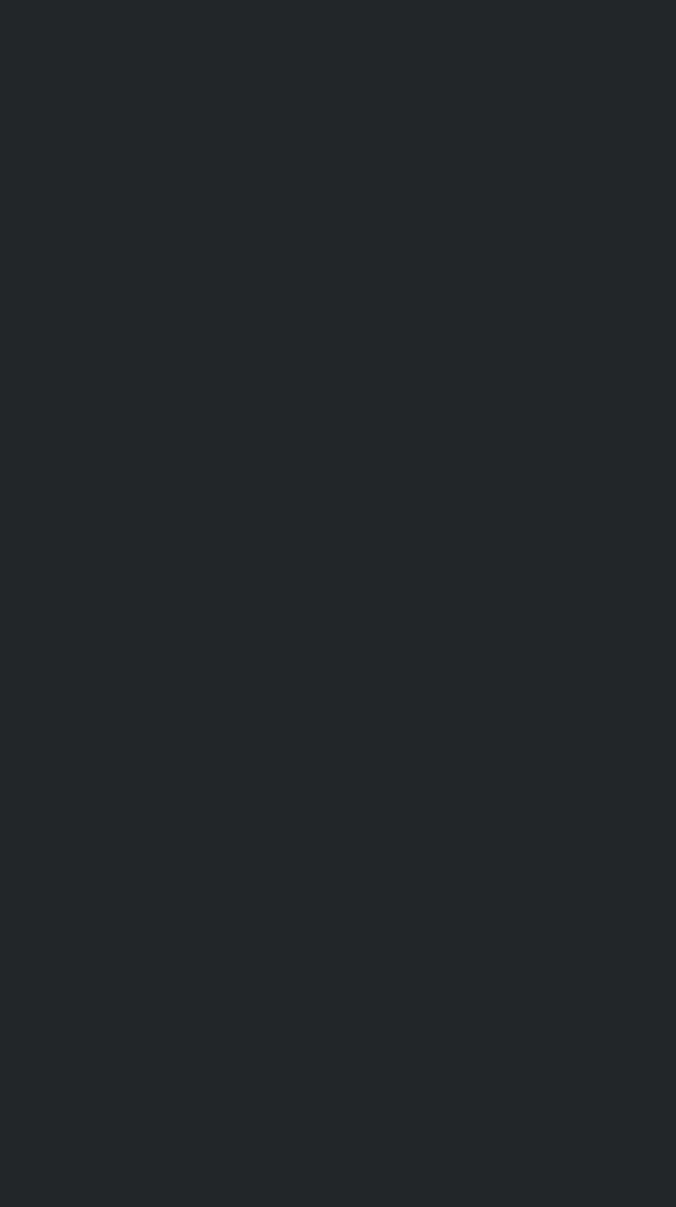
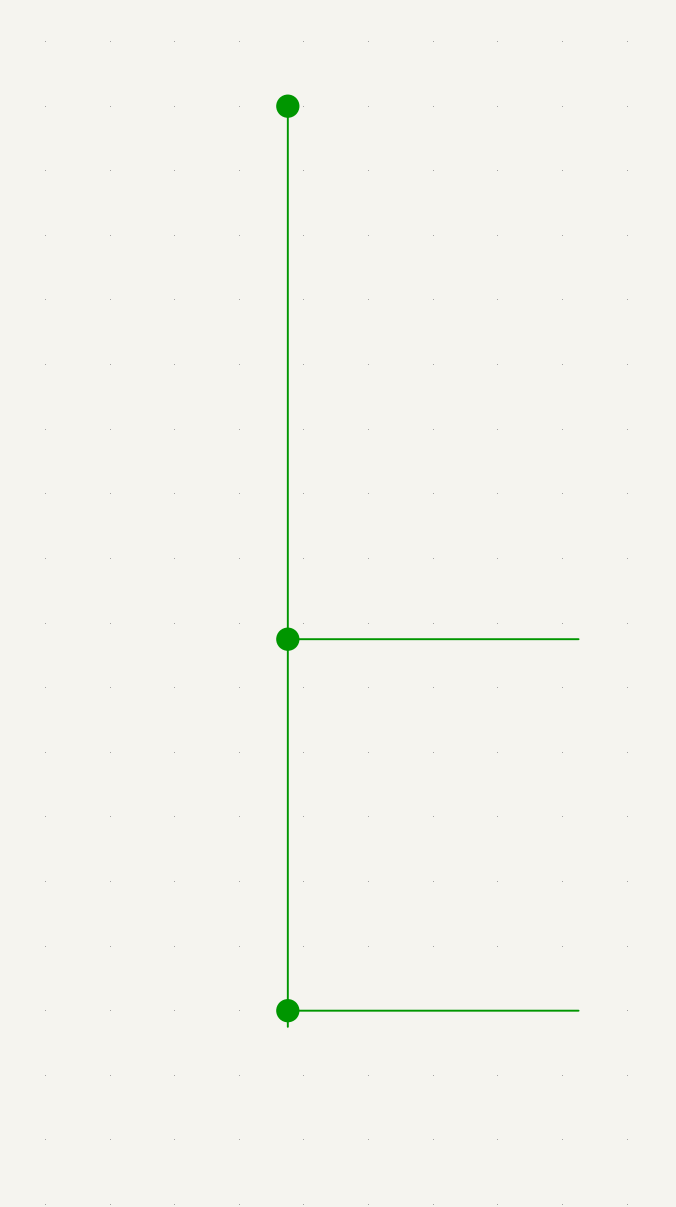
wire: none -> (287, 106) (287, 1026)
junction: none -> (287, 106)
wire: none -> (287, 639) (578, 639)
junction: none -> (287, 639)
wire: none -> (287, 1010) (578, 1010)
junction: none -> (287, 1010)

